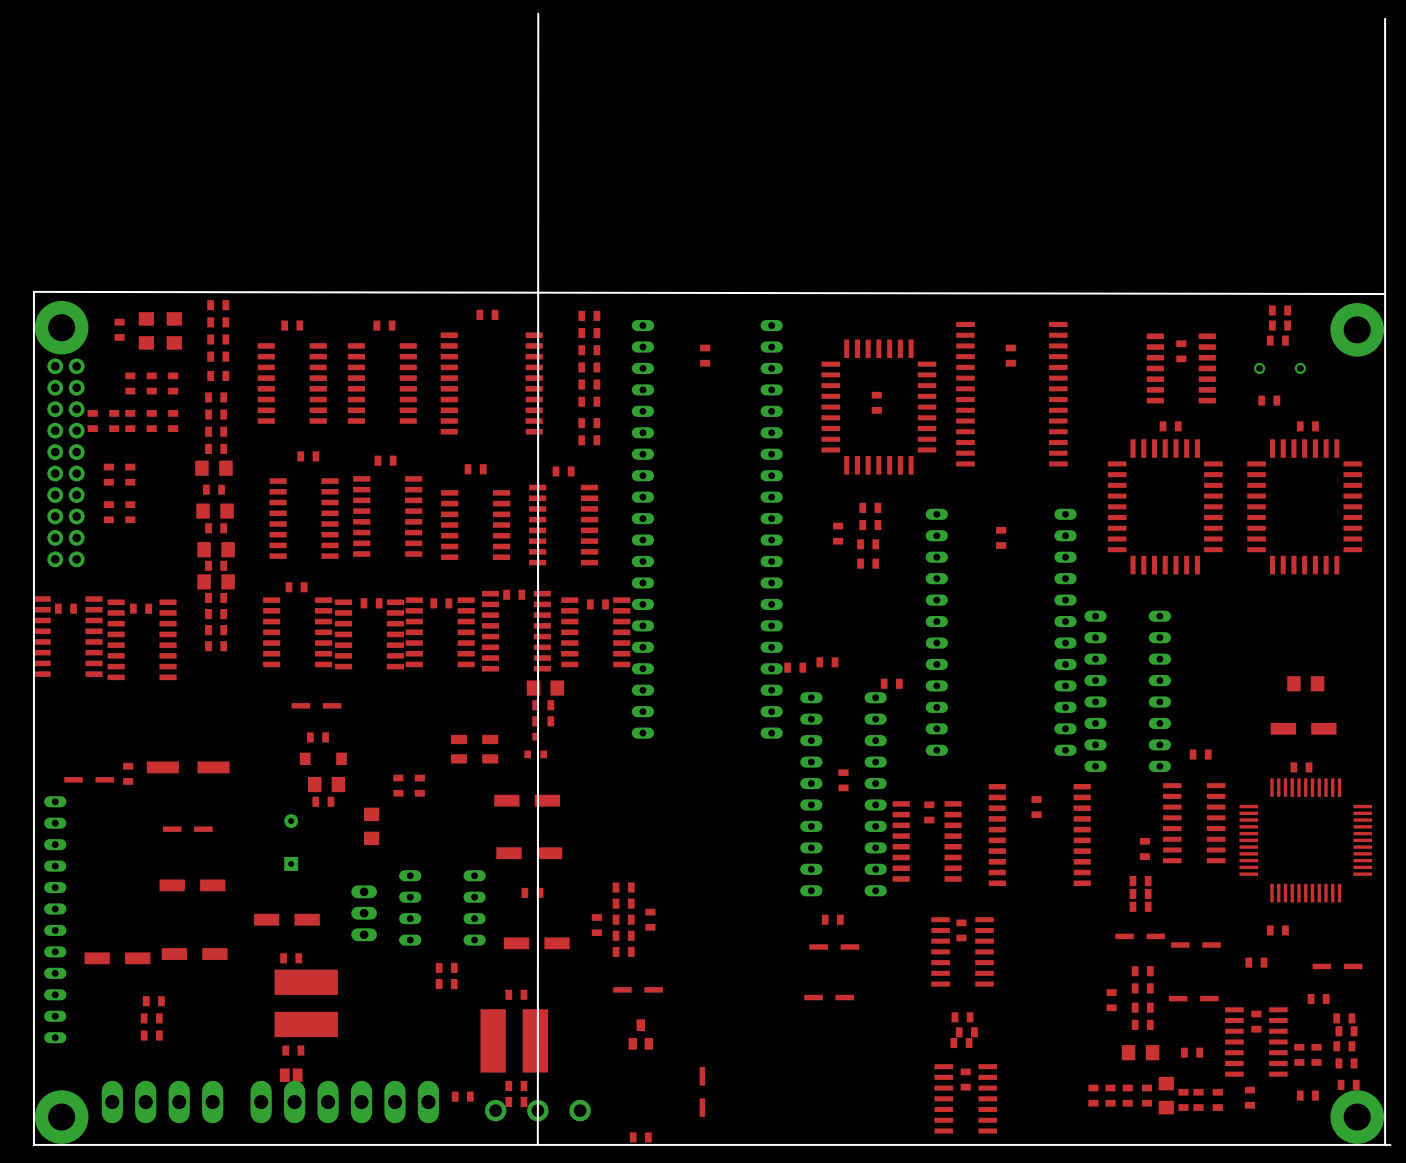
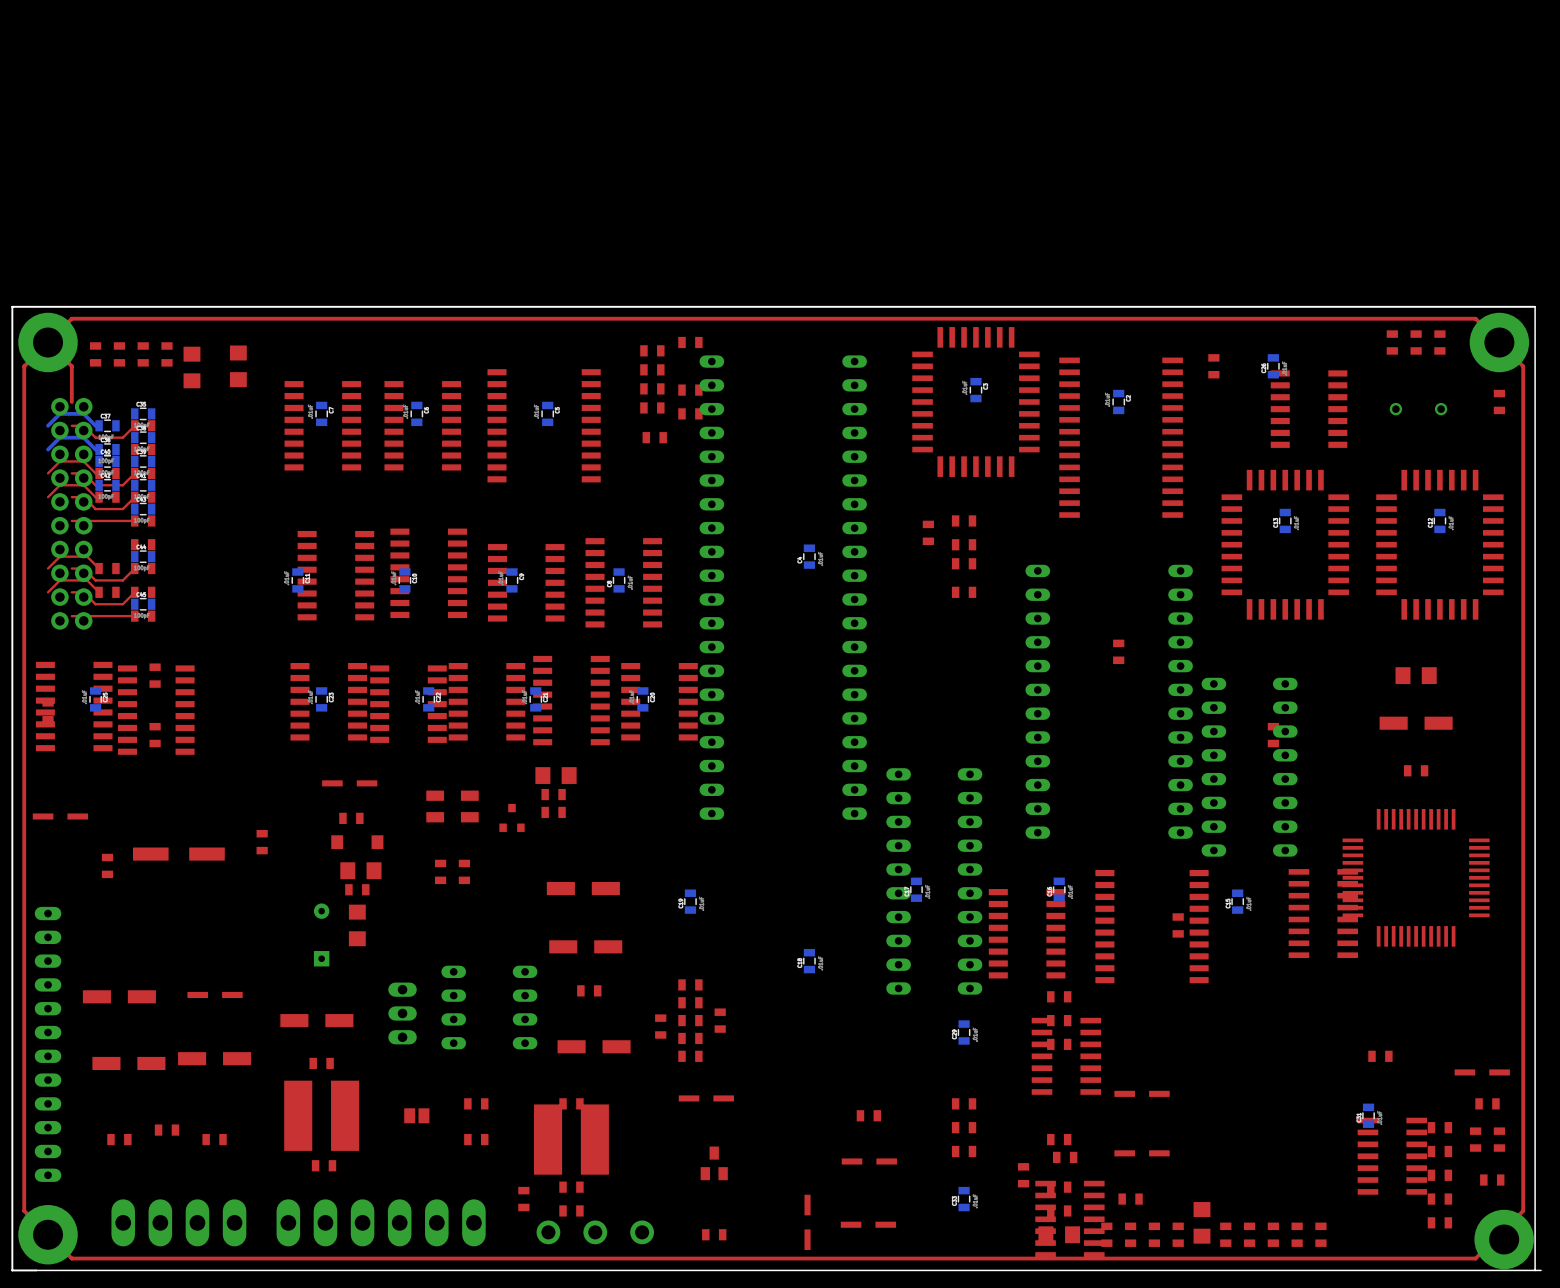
board edge: (538, 13) (537, 1144) -> none
board edge: (1385, 18) (1385, 276) -> none
top track: none -> (1475, 318) (71, 318) (24, 366) (24, 1210) (71, 1258) (1475, 1258) (1523, 1210) (1523, 366) (1475, 318)
board edge: (1385, 294) (33, 291) (33, 1144) -> (1535, 306) (12, 306) (12, 1270) (36, 1270)
part side: top (218, 305) -> bottom (143, 413)
top track: none -> (48, 342) (71, 366) (71, 401)
part: none -> (690, 342)
part: none -> (1392, 342)
part: none -> (1439, 342)
part rotation: 0° (1280, 310) -> 90° clockwise (1416, 342)
part side: top (487, 314) -> bottom (547, 413)
part: none -> (95, 354)
part: none -> (119, 354)
part: none -> (143, 354)
part: none -> (166, 354)
part: (218, 322) -> none
part side: top (292, 325) -> bottom (321, 413)
part side: top (384, 325) -> bottom (416, 413)
part: (1280, 325) -> none
part position: (61, 327) -> (48, 342)
part: (119, 329) -> none
part: none -> (238, 366)
part: none -> (1213, 366)
part position: (1357, 329) -> (1499, 342)
part: (146, 330) -> none
part side: top (218, 339) -> bottom (107, 425)
part: (1277, 340) -> none
part: none -> (690, 390)
part side: top (1181, 351) -> bottom (1273, 366)
part side: top (705, 355) -> bottom (809, 556)
part side: top (1010, 355) -> bottom (1118, 401)
part: (218, 356) -> none
part: none -> (1499, 401)
part: none -> (690, 413)
part side: top (218, 375) -> bottom (107, 449)
bottom track: none -> (99, 425) (95, 425) (83, 413) (59, 413) (48, 425)
top track: none -> (134, 425) (122, 437) (95, 437) (83, 425) (71, 425)
part rotation: 0° (130, 383) -> 90° clockwise (143, 425)
part: (151, 383) -> none
part side: top (173, 383) -> bottom (143, 604)
part: (589, 384) -> none
part: none -> (654, 437)
part: (216, 397) -> none
part: (1269, 400) -> none
part: (589, 401) -> none
part side: top (876, 402) -> bottom (975, 390)
bottom track: none -> (99, 449) (95, 449) (83, 437) (59, 437) (48, 449)
part: none -> (143, 449)
part position: (878, 407) -> (975, 401)
part side: top (216, 414) -> bottom (143, 437)
part rotation: 0° (92, 421) -> 90° clockwise (107, 473)
part: (114, 421) -> none
part rotation: 0° (130, 421) -> 90° clockwise (143, 473)
part: (151, 421) -> none
part: (173, 421) -> none
part: (589, 423) -> none
top track: none -> (99, 473) (95, 473) (83, 461) (59, 461) (48, 473)
top track: none -> (134, 473) (122, 485) (95, 485) (83, 473) (71, 473)
part side: top (1170, 426) -> bottom (1285, 520)
part side: top (1307, 426) -> bottom (1439, 520)
part: (216, 431) -> none
part: (589, 440) -> none
top track: none -> (99, 497) (95, 497) (83, 485) (59, 485) (48, 497)
part: none -> (107, 497)
top track: none -> (134, 497) (122, 509) (95, 509) (83, 497) (71, 497)
part: none -> (143, 497)
part side: top (216, 448) -> bottom (143, 461)
part side: top (308, 456) -> bottom (297, 580)
part side: top (385, 460) -> bottom (404, 580)
part: (213, 468) -> none
top track: none -> (134, 520) (71, 520)
part side: top (475, 469) -> bottom (511, 580)
part: none -> (964, 520)
part side: top (563, 471) -> bottom (619, 580)
part: (108, 474) -> none
part rotation: 0° (130, 474) -> 90° clockwise (143, 520)
part: none -> (928, 532)
part side: top (213, 489) -> bottom (107, 461)
part: none -> (143, 544)
part: none -> (964, 544)
part position: (1165, 506) -> (1285, 544)
part position: (1304, 506) -> (1439, 544)
part: (215, 511) -> none
top track: none -> (99, 568) (87, 556) (59, 556) (48, 568)
part rotation: 0° (108, 512) -> 90° clockwise (107, 568)
top track: none -> (134, 568) (122, 580) (95, 580) (83, 568) (71, 568)
part rotation: 0° (130, 512) -> 90° clockwise (143, 568)
part: (870, 525) -> none
part side: top (216, 528) -> bottom (143, 485)
top track: none -> (99, 592) (87, 580) (59, 580) (48, 592)
part: none -> (107, 592)
top track: none -> (134, 592) (122, 604) (95, 604) (83, 592) (71, 592)
part: none -> (143, 592)
part: (838, 533) -> none
part: none -> (964, 592)
part position: (1001, 537) -> (1118, 651)
part: (868, 544) -> none
part: (216, 549) -> none
top track: none -> (134, 616) (71, 616)
part: none -> (143, 616)
part: (868, 563) -> none
part side: top (216, 565) -> bottom (107, 485)
part: (216, 581) -> none
part side: top (296, 587) -> bottom (321, 699)
part side: top (514, 594) -> bottom (642, 699)
part side: top (216, 597) -> bottom (143, 509)
part side: top (371, 603) -> bottom (428, 699)
part side: top (441, 603) -> bottom (535, 699)
part side: top (597, 604) -> bottom (690, 901)
part side: top (65, 608) -> bottom (95, 699)
part rotation: 0° (141, 608) -> 90° clockwise (155, 675)
part: (216, 614) -> none
part side: top (216, 630) -> bottom (143, 556)
part: none -> (48, 711)
part: (216, 646) -> none
part: none -> (155, 735)
part: (827, 662) -> none
part: none -> (1273, 735)
part: (795, 667) -> none
part: (891, 683) -> none
part position: (1305, 683) -> (1416, 675)
part position: (545, 688) -> (556, 775)
part: (543, 705) -> none
part: none -> (553, 794)
part: (543, 721) -> none
part position: (1303, 728) -> (1416, 723)
part: none -> (553, 812)
part position: (535, 745) -> (511, 817)
part position: (474, 749) -> (452, 806)
part side: top (1200, 754) -> bottom (1237, 901)
part: none -> (262, 842)
part position: (188, 767) -> (178, 854)
part position: (1301, 767) -> (1416, 770)
part position: (128, 773) -> (107, 865)
part position: (89, 779) -> (60, 816)
part side: top (843, 780) -> bottom (809, 961)
part side: top (1036, 807) -> bottom (1059, 889)
part side: top (929, 812) -> bottom (916, 889)
part position: (371, 826) -> (357, 925)
part position: (187, 829) -> (215, 994)
part: none -> (1178, 925)
part position: (1305, 840) -> (1416, 877)
part: (1144, 848) -> none
part: (1140, 881) -> none
part position: (192, 885) -> (119, 996)
part: (1140, 893) -> none
part: none -> (1059, 996)
part: (1140, 906) -> none
part: (55, 919) -> none
part: (832, 919) -> none
part: none -> (1059, 1020)
part side: top (961, 930) -> bottom (964, 1032)
part: (1277, 930) -> none
part: (1140, 936) -> none
part: none -> (48, 1044)
part: none -> (1059, 1044)
part: (1195, 944) -> none
part: (834, 946) -> none
part position: (1256, 962) -> (1380, 1056)
part: (446, 967) -> none
part: (1142, 971) -> none
part: (446, 984) -> none
part: none -> (1142, 1093)
part: (1142, 988) -> none
part: none -> (476, 1103)
part: none -> (964, 1103)
part: none -> (1487, 1103)
part: (829, 997) -> none
part: (1193, 998) -> none
part: (1318, 999) -> none
part: (1111, 1000) -> none
part: (153, 1001) -> none
part rotation: 0° (306, 1003) -> 90° clockwise (321, 1115)
part: none -> (868, 1115)
part: (1142, 1007) -> none
part: none -> (964, 1127)
part: none -> (1439, 1127)
part: (962, 1017) -> none
part: (1344, 1018) -> none
part side: top (1256, 1021) -> bottom (1368, 1115)
part: (1142, 1024) -> none
part: none -> (119, 1139)
part: none -> (214, 1139)
part: none -> (476, 1139)
part: none -> (1059, 1139)
part: none -> (1475, 1139)
part: none -> (1499, 1139)
part: (1346, 1031) -> none
part: (966, 1032) -> none
part position: (640, 1034) -> (714, 1163)
part: (151, 1035) -> none
part: none -> (964, 1151)
part: none -> (1439, 1151)
part: none -> (1142, 1153)
part position: (514, 1040) -> (571, 1139)
part: none -> (869, 1161)
part: (1344, 1046) -> none
part: (1140, 1052) -> none
part: (1192, 1052) -> none
part rotation: 0° (1299, 1054) -> 90° clockwise (1439, 1175)
part: (1316, 1054) -> none
part: none -> (1023, 1175)
part: none -> (571, 1187)
part: none -> (1059, 1187)
part position: (291, 1075) -> (416, 1115)
part side: top (965, 1079) -> bottom (964, 1199)
part: none -> (1130, 1199)
part: none -> (1439, 1199)
part: (1348, 1084) -> none
part: (516, 1085) -> none
part: none -> (571, 1210)
part position: (702, 1091) -> (807, 1222)
part: none -> (1059, 1210)
part: (1093, 1095) -> none
part: (1110, 1095) -> none
part: (1127, 1095) -> none
part: (1147, 1095) -> none
part: (1166, 1095) -> none
part: (1307, 1095) -> none
part rotation: 0° (462, 1096) -> 90° clockwise (523, 1199)
part position: (462, 1096) -> (523, 1199)
part: (1249, 1097) -> none
part: (1183, 1099) -> none
part: (1198, 1099) -> none
part: (1217, 1099) -> none
part: (516, 1102) -> none
part: none -> (1201, 1222)
part: none -> (1439, 1222)
part: none -> (868, 1224)
part: none -> (1059, 1234)
part: none -> (1106, 1234)
part: none -> (1130, 1234)
part: none -> (1154, 1234)
part: none -> (1178, 1234)
part: none -> (1225, 1234)
part: none -> (1249, 1234)
part: none -> (1273, 1234)
part: none -> (1297, 1234)
part: none -> (1320, 1234)
part position: (61, 1117) -> (48, 1234)
part position: (640, 1137) -> (714, 1234)

